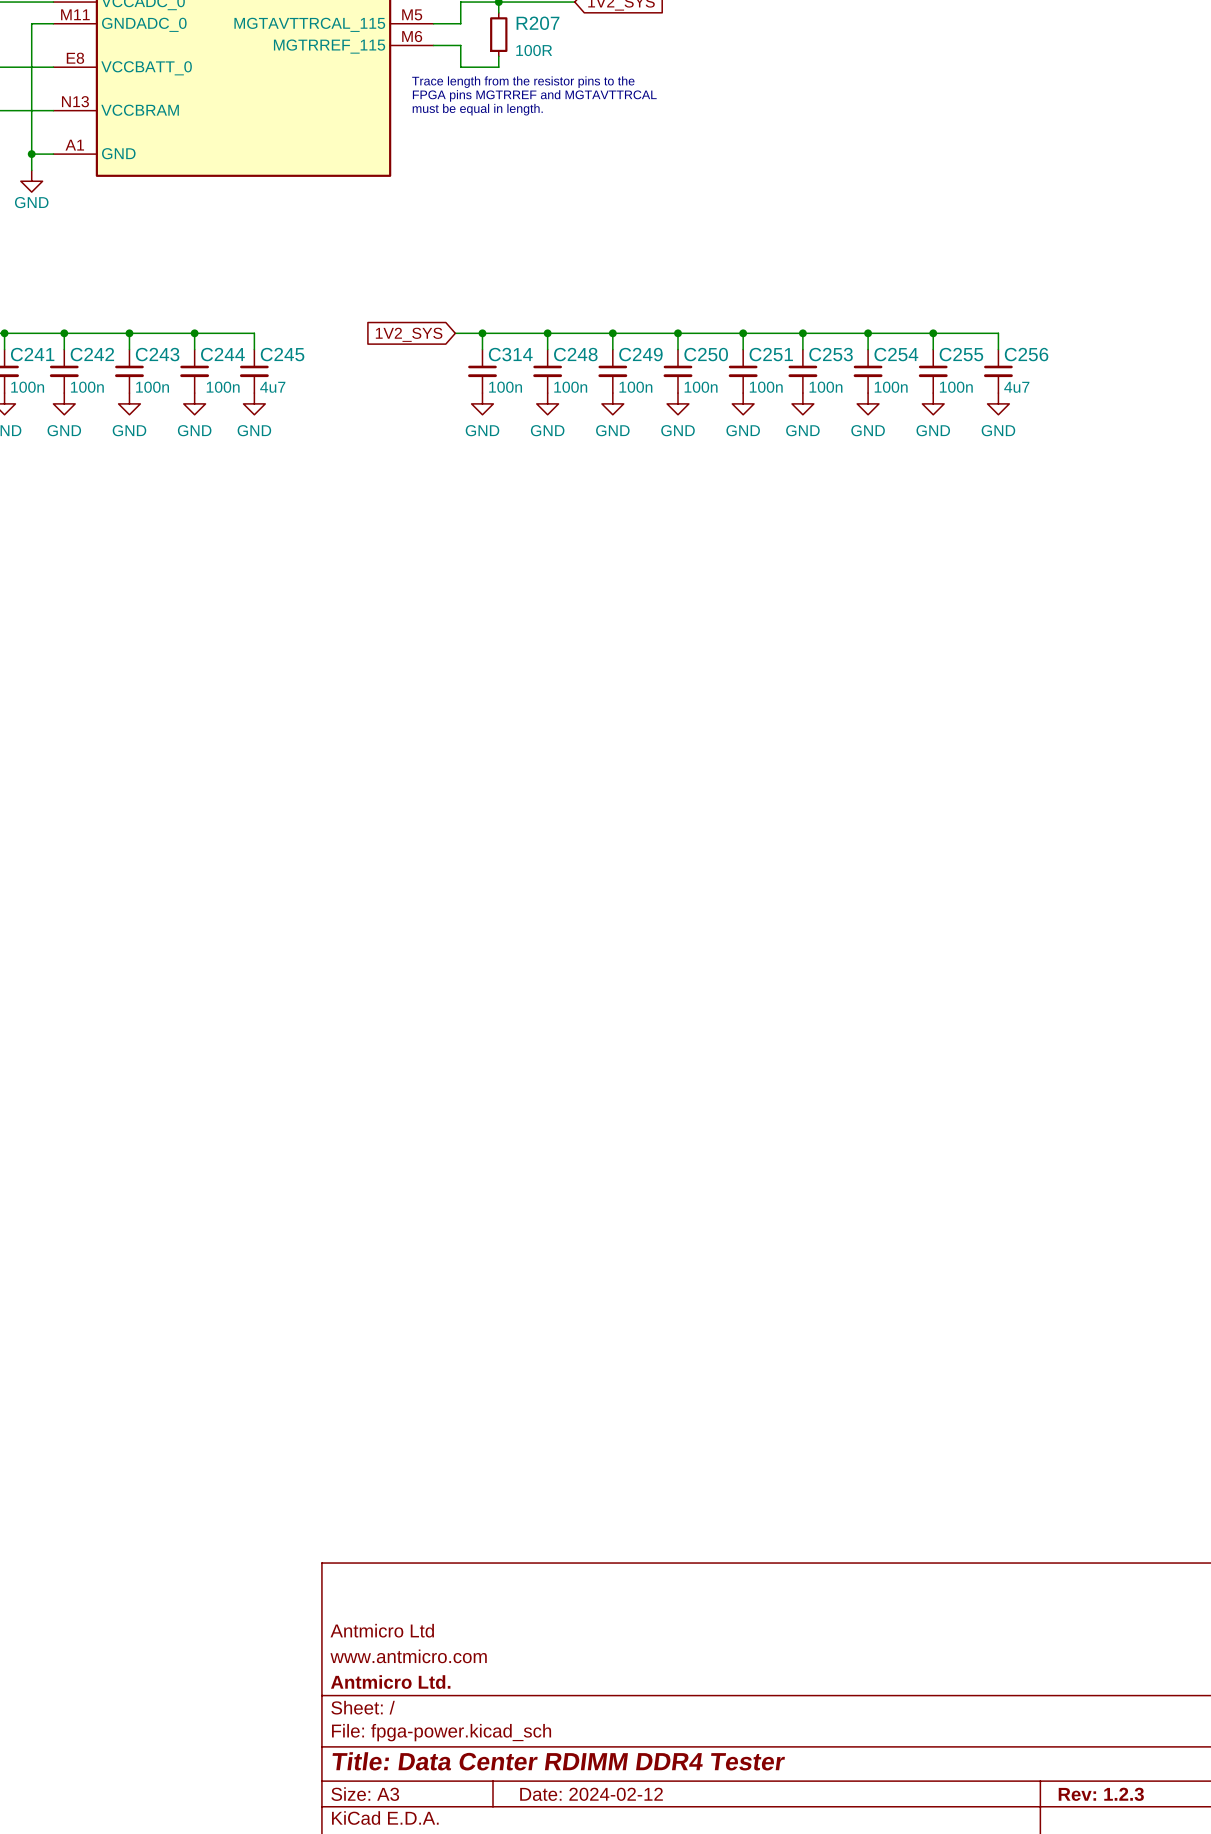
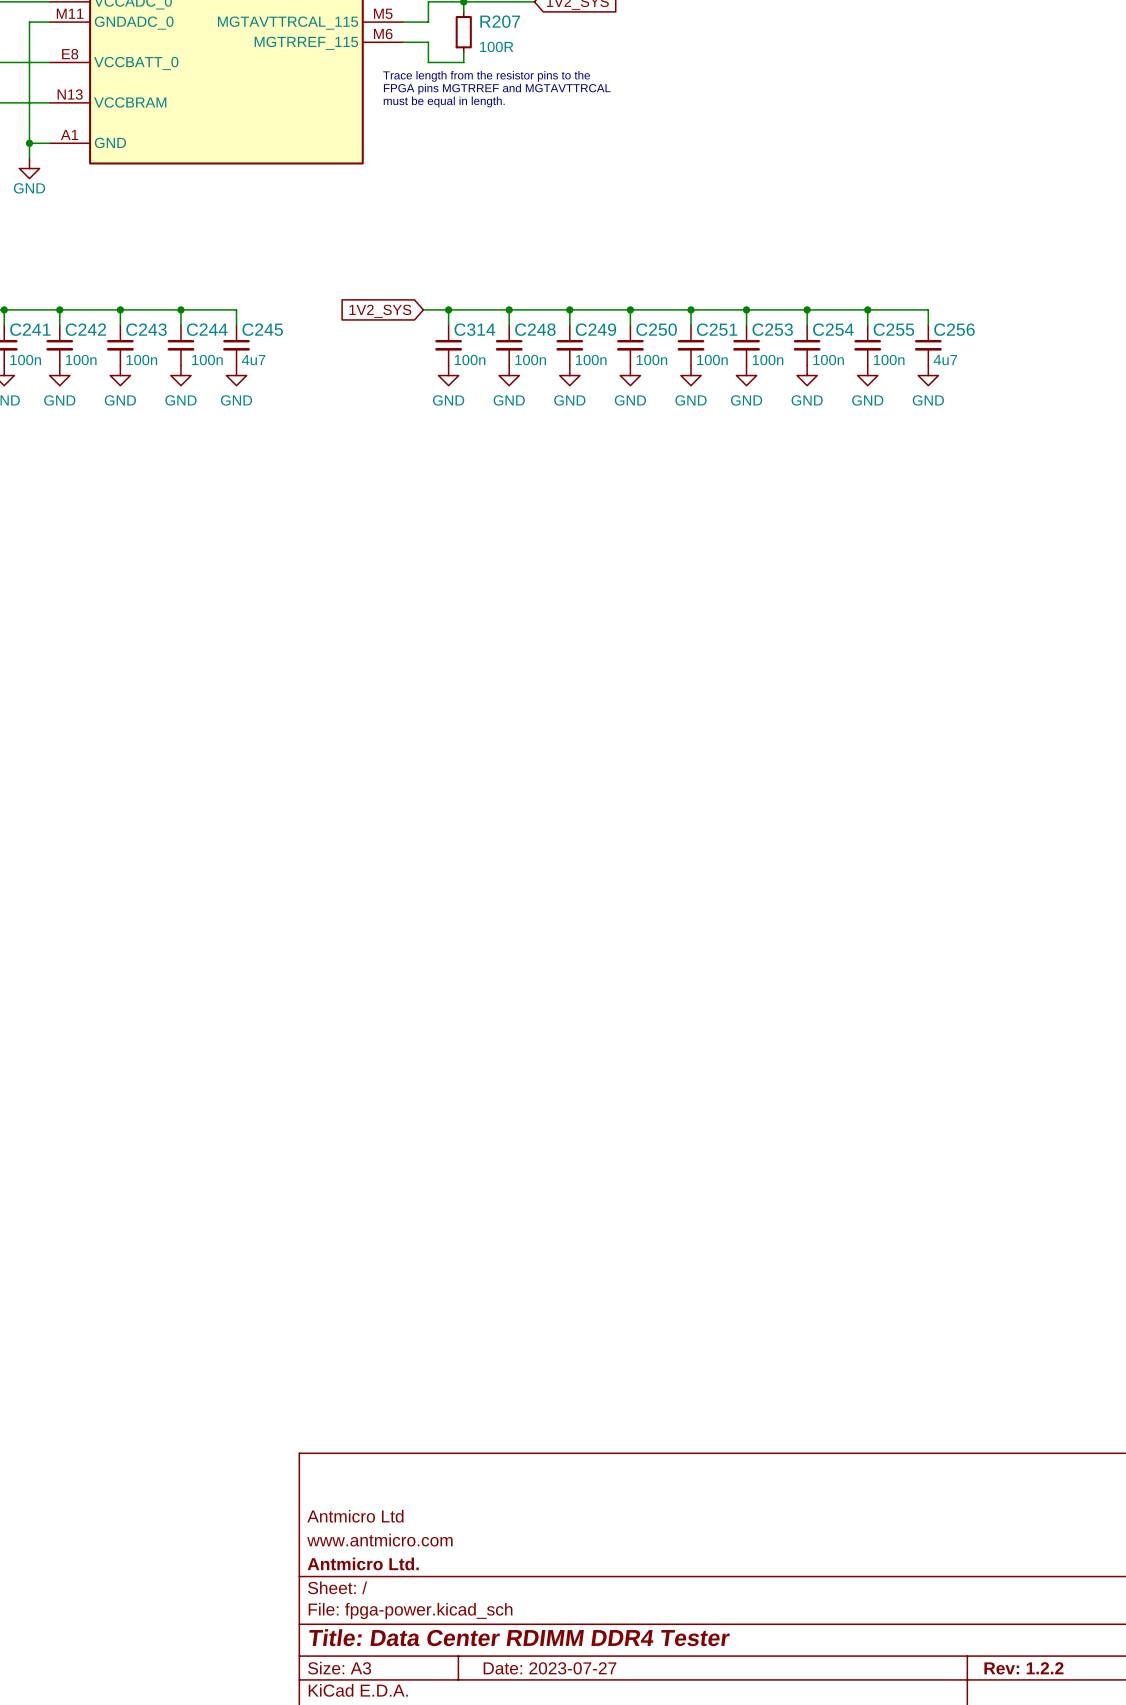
title block: Date: 2024-02-12 (591, 1794) -> Date: 2023-07-27 (550, 1668)
title block: Rev: 1.2.3 (1101, 1794) -> Rev: 1.2.2 (1023, 1668)

